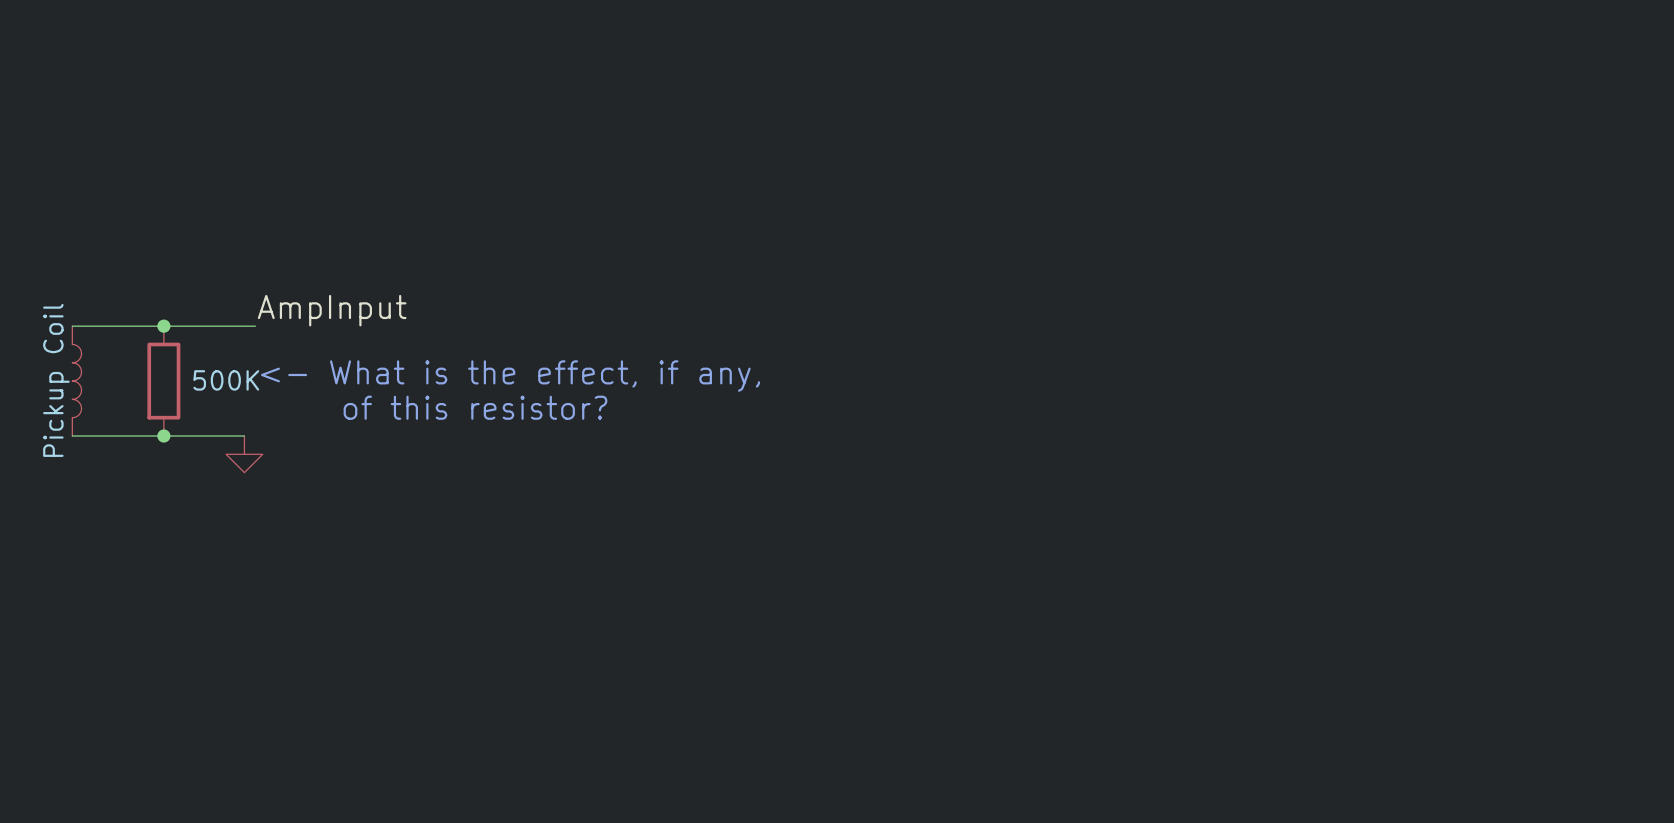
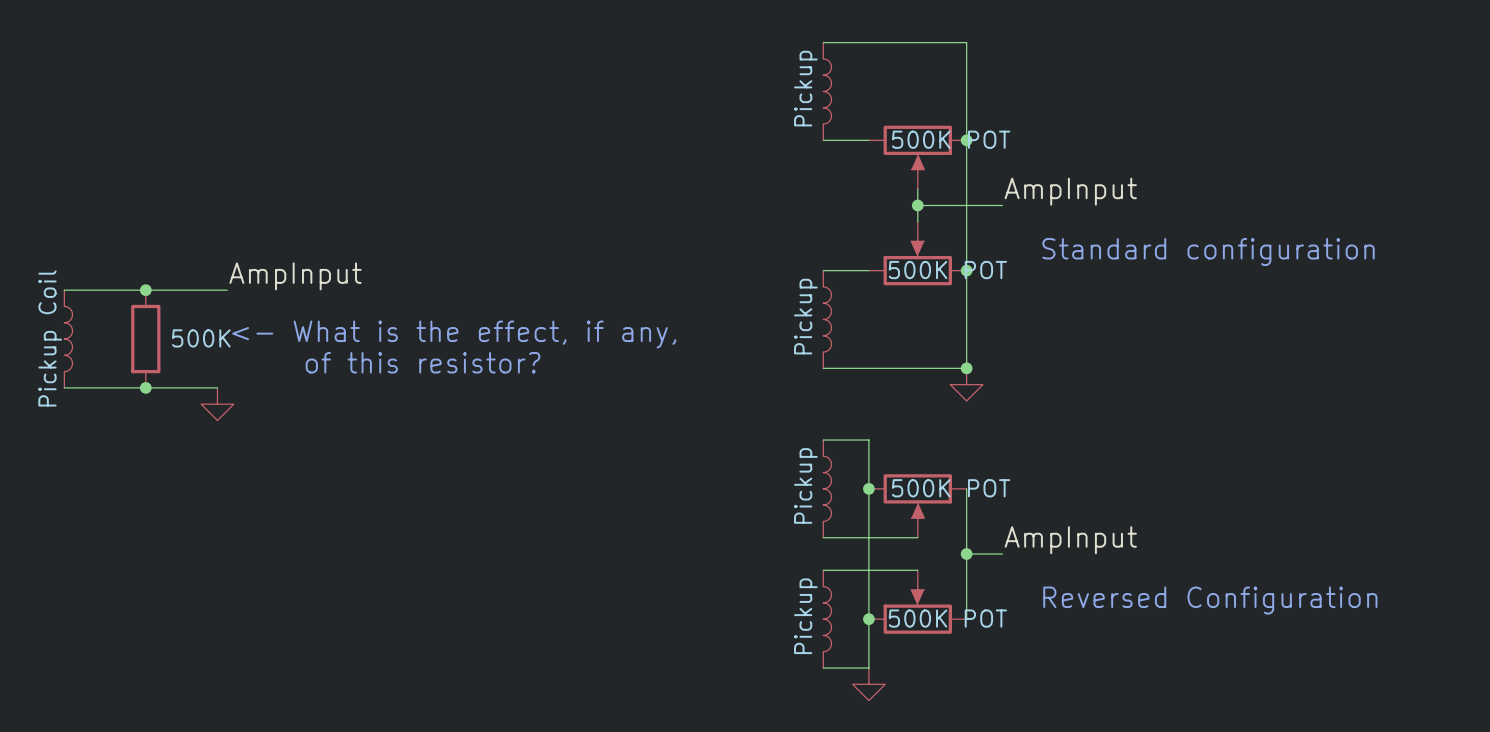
wire: none -> (823, 42) (966, 42) (966, 368) (823, 368)
part: none -> Pickup (827, 91)
wire: none -> (823, 140) (868, 140)
junction: none -> (966, 140)
part: none -> 500K POT (917, 157)
wire: none -> (917, 189) (917, 221)
label: none -> AmpInput (1070, 191)
wire: none -> (917, 205) (1002, 205)
junction: none -> (917, 205)
text: none -> Standard configuration (1208, 252)
part: none -> 500K POT (917, 253)
wire: none -> (823, 270) (868, 270)
junction: none -> (966, 270)
part: none -> Pickup (827, 319)
junction: none -> (966, 368)
power symbol: none -> (966, 384)
wire: none -> (823, 440) (868, 440) (868, 619)
part: none -> Pickup (827, 488)
junction: none -> (868, 488)
wire: none -> (966, 488) (966, 619)
part: none -> 500K POT (917, 505)
wire: none -> (823, 537) (917, 537)
label: none -> AmpInput (1070, 540)
wire: none -> (966, 554) (1002, 554)
junction: none -> (966, 554)
wire: none -> (823, 570) (917, 570)
text: none -> Reversed Configuration (1210, 600)
part: none -> 500K POT (917, 602)
part: none -> Pickup (827, 619)
junction: none -> (868, 619)
wire: none -> (868, 622) (868, 668) (823, 668)
power symbol: none -> (868, 684)

